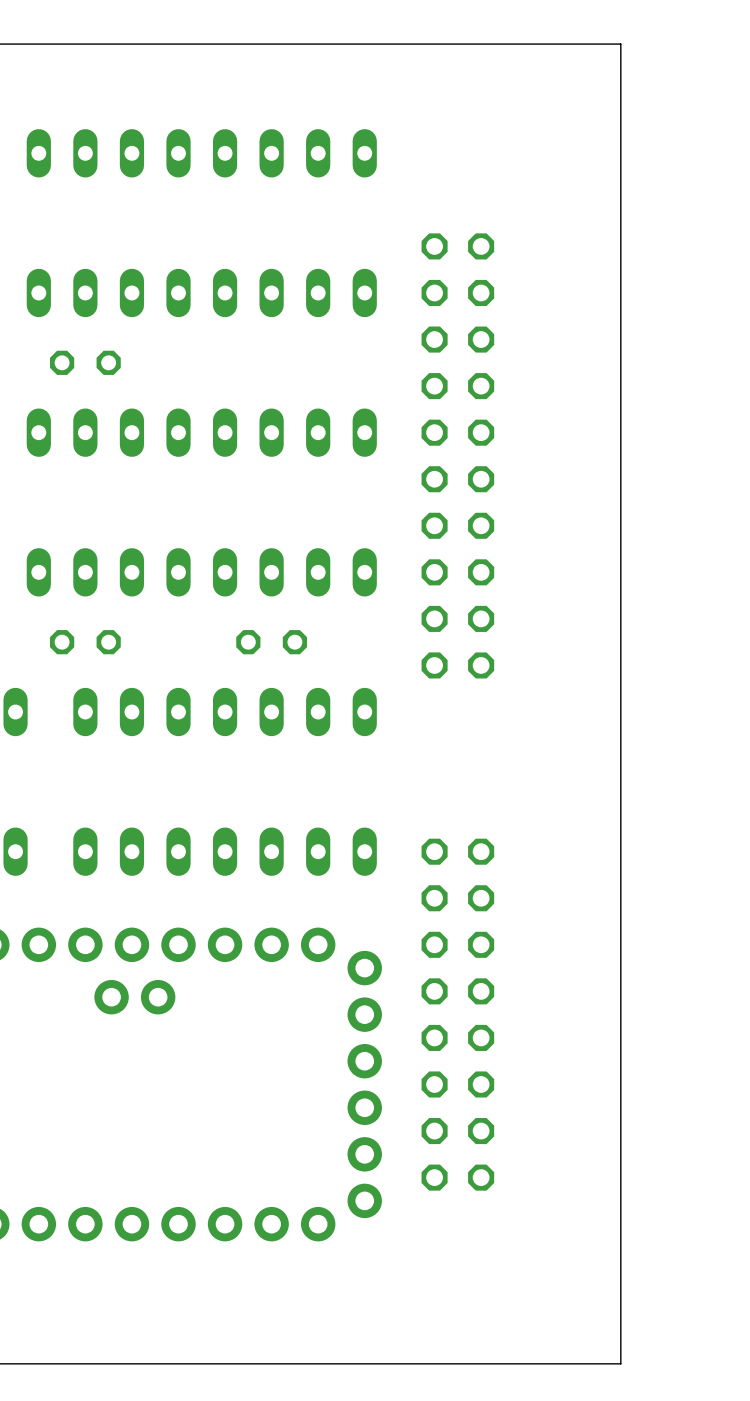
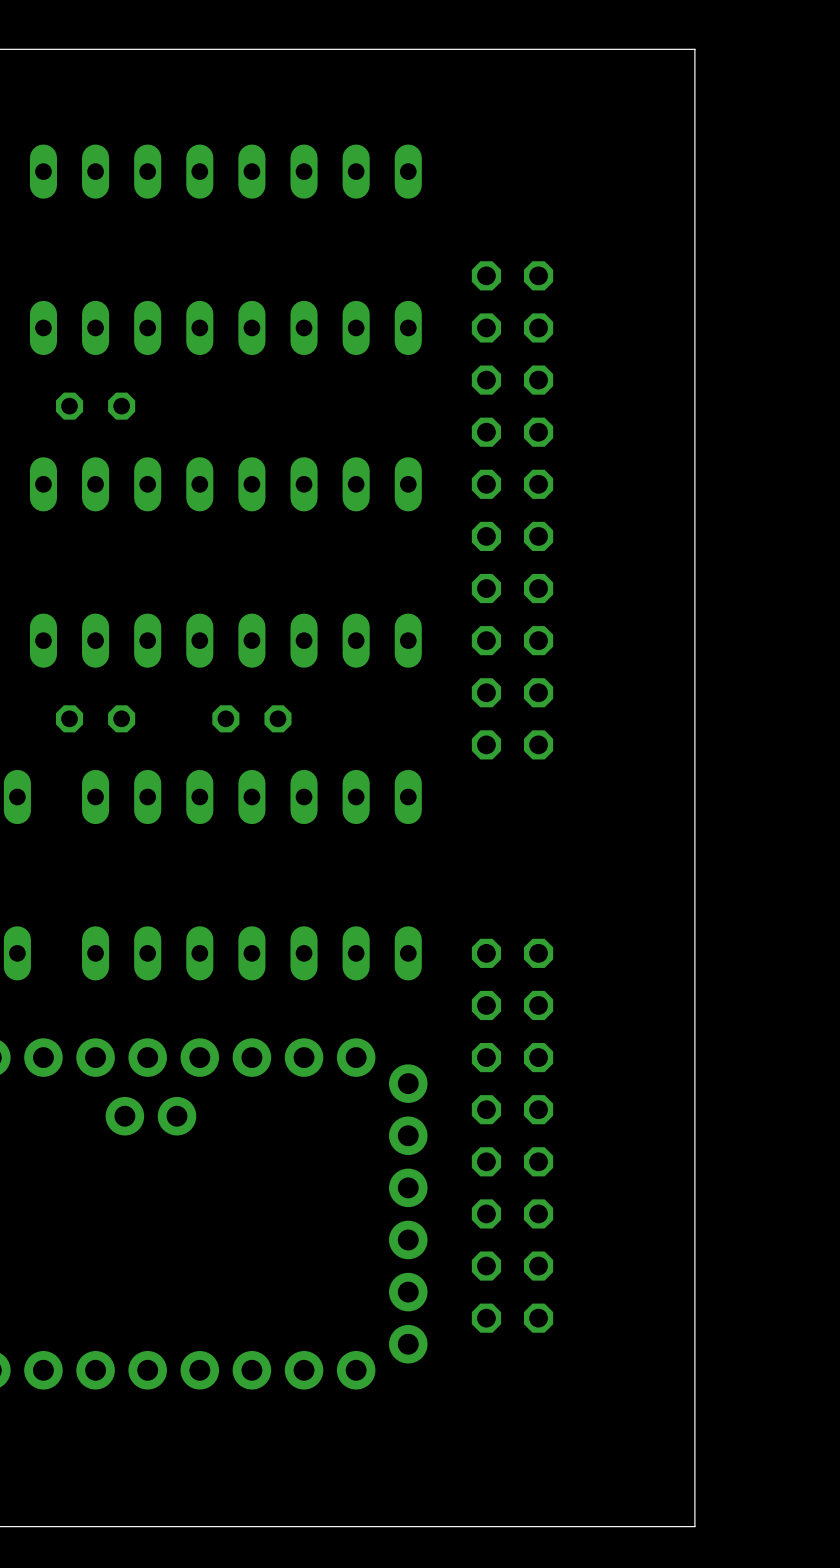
part position: (271, 642) -> (251, 718)

